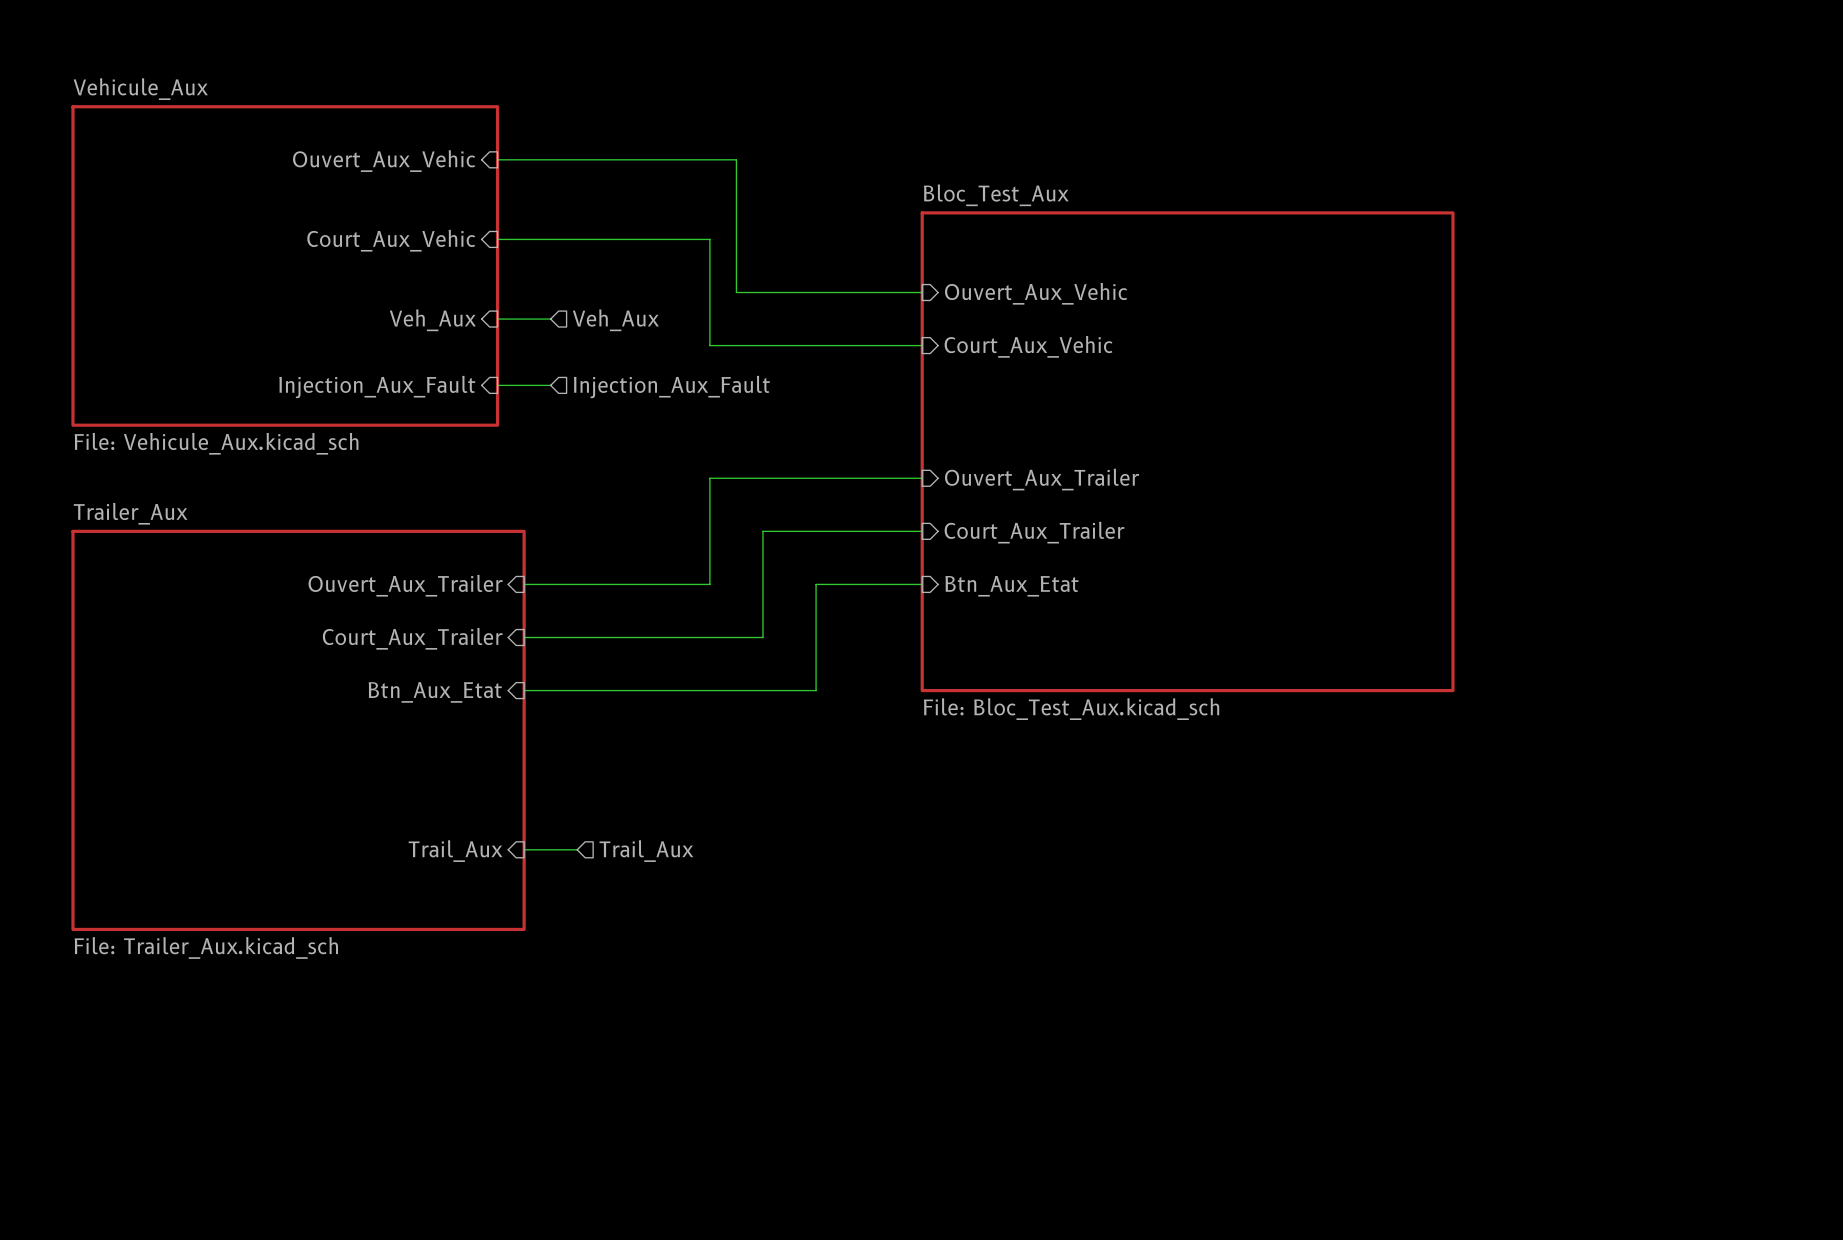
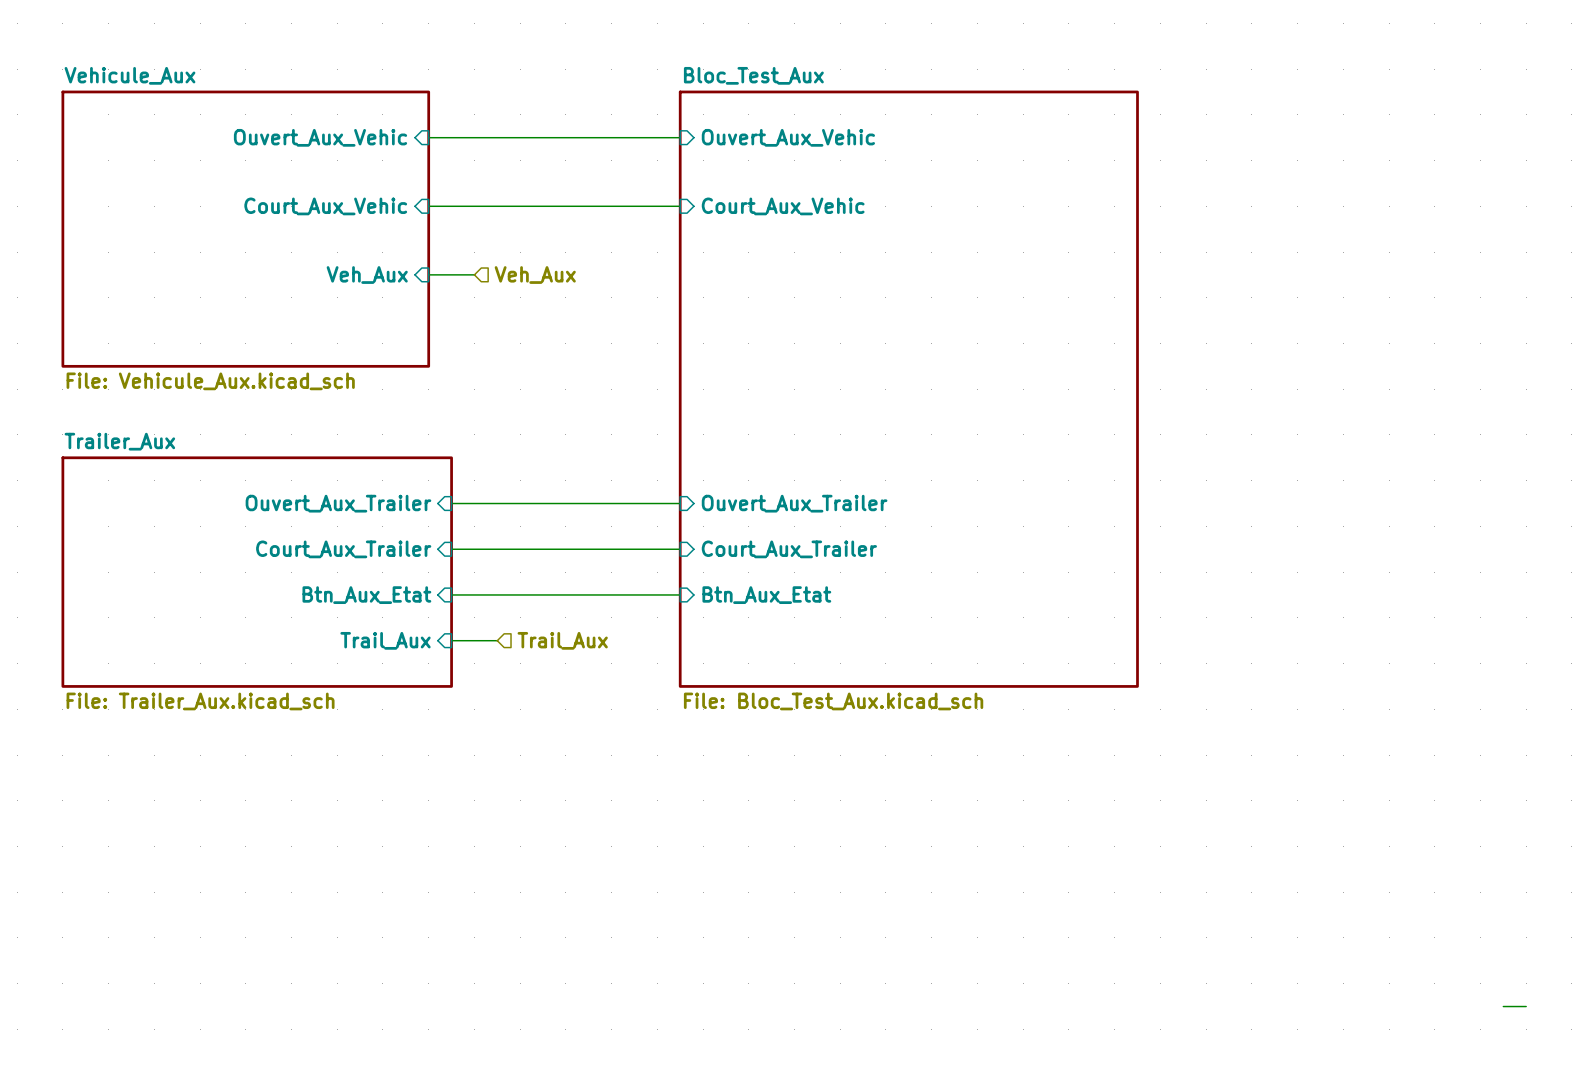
wire: (736, 159) (736, 292) (922, 292) -> (634, 137) (680, 137)
wire: (709, 239) (709, 345) (922, 345) -> (611, 206) (680, 206)
sheet pin position: Ouvert_Aux_Vehic (1036, 293) -> Ouvert_Aux_Vehic (788, 137)
sheet pin position: Court_Aux_Vehic (1028, 346) -> Court_Aux_Vehic (783, 206)
wire: (497, 385) (550, 385) -> none
sheet pin: Injection_Aux_Fault (377, 386) -> none
hierarchical label: Injection_Aux_Fault (671, 386) -> none
sheet Bloc_Test_Aux: none -> File: Bloc_Test_Aux.kicad_sch (908, 389)
sheet Bloc_Test_Aux: File: Bloc_Test_Aux.kicad_sch (1187, 451) -> none
wire: (922, 478) (709, 478) (709, 584) -> (680, 503) (611, 503)
sheet pin position: Ouvert_Aux_Trailer (1042, 479) -> Ouvert_Aux_Trailer (794, 503)
wire: (922, 531) (762, 531) (762, 637) -> (680, 549) (657, 549)
sheet pin position: Court_Aux_Trailer (1034, 532) -> Court_Aux_Trailer (789, 549)
wire: (922, 584) (816, 584) (816, 690) (789, 690) -> none
sheet pin position: Btn_Aux_Etat (1011, 586) -> Btn_Aux_Etat (766, 595)
sheet Trailer_Aux: none -> File: Trailer_Aux.kicad_sch (257, 572)
sheet Trailer_Aux: File: Trailer_Aux.kicad_sch (298, 730) -> none
wire: (524, 849) (577, 849) -> (451, 640) (497, 640)
sheet pin position: Trail_Aux (455, 851) -> Trail_Aux (385, 640)
hierarchical label position: Trail_Aux (646, 851) -> Trail_Aux (562, 640)
wire: none -> (1503, 1006) (1526, 1006)

